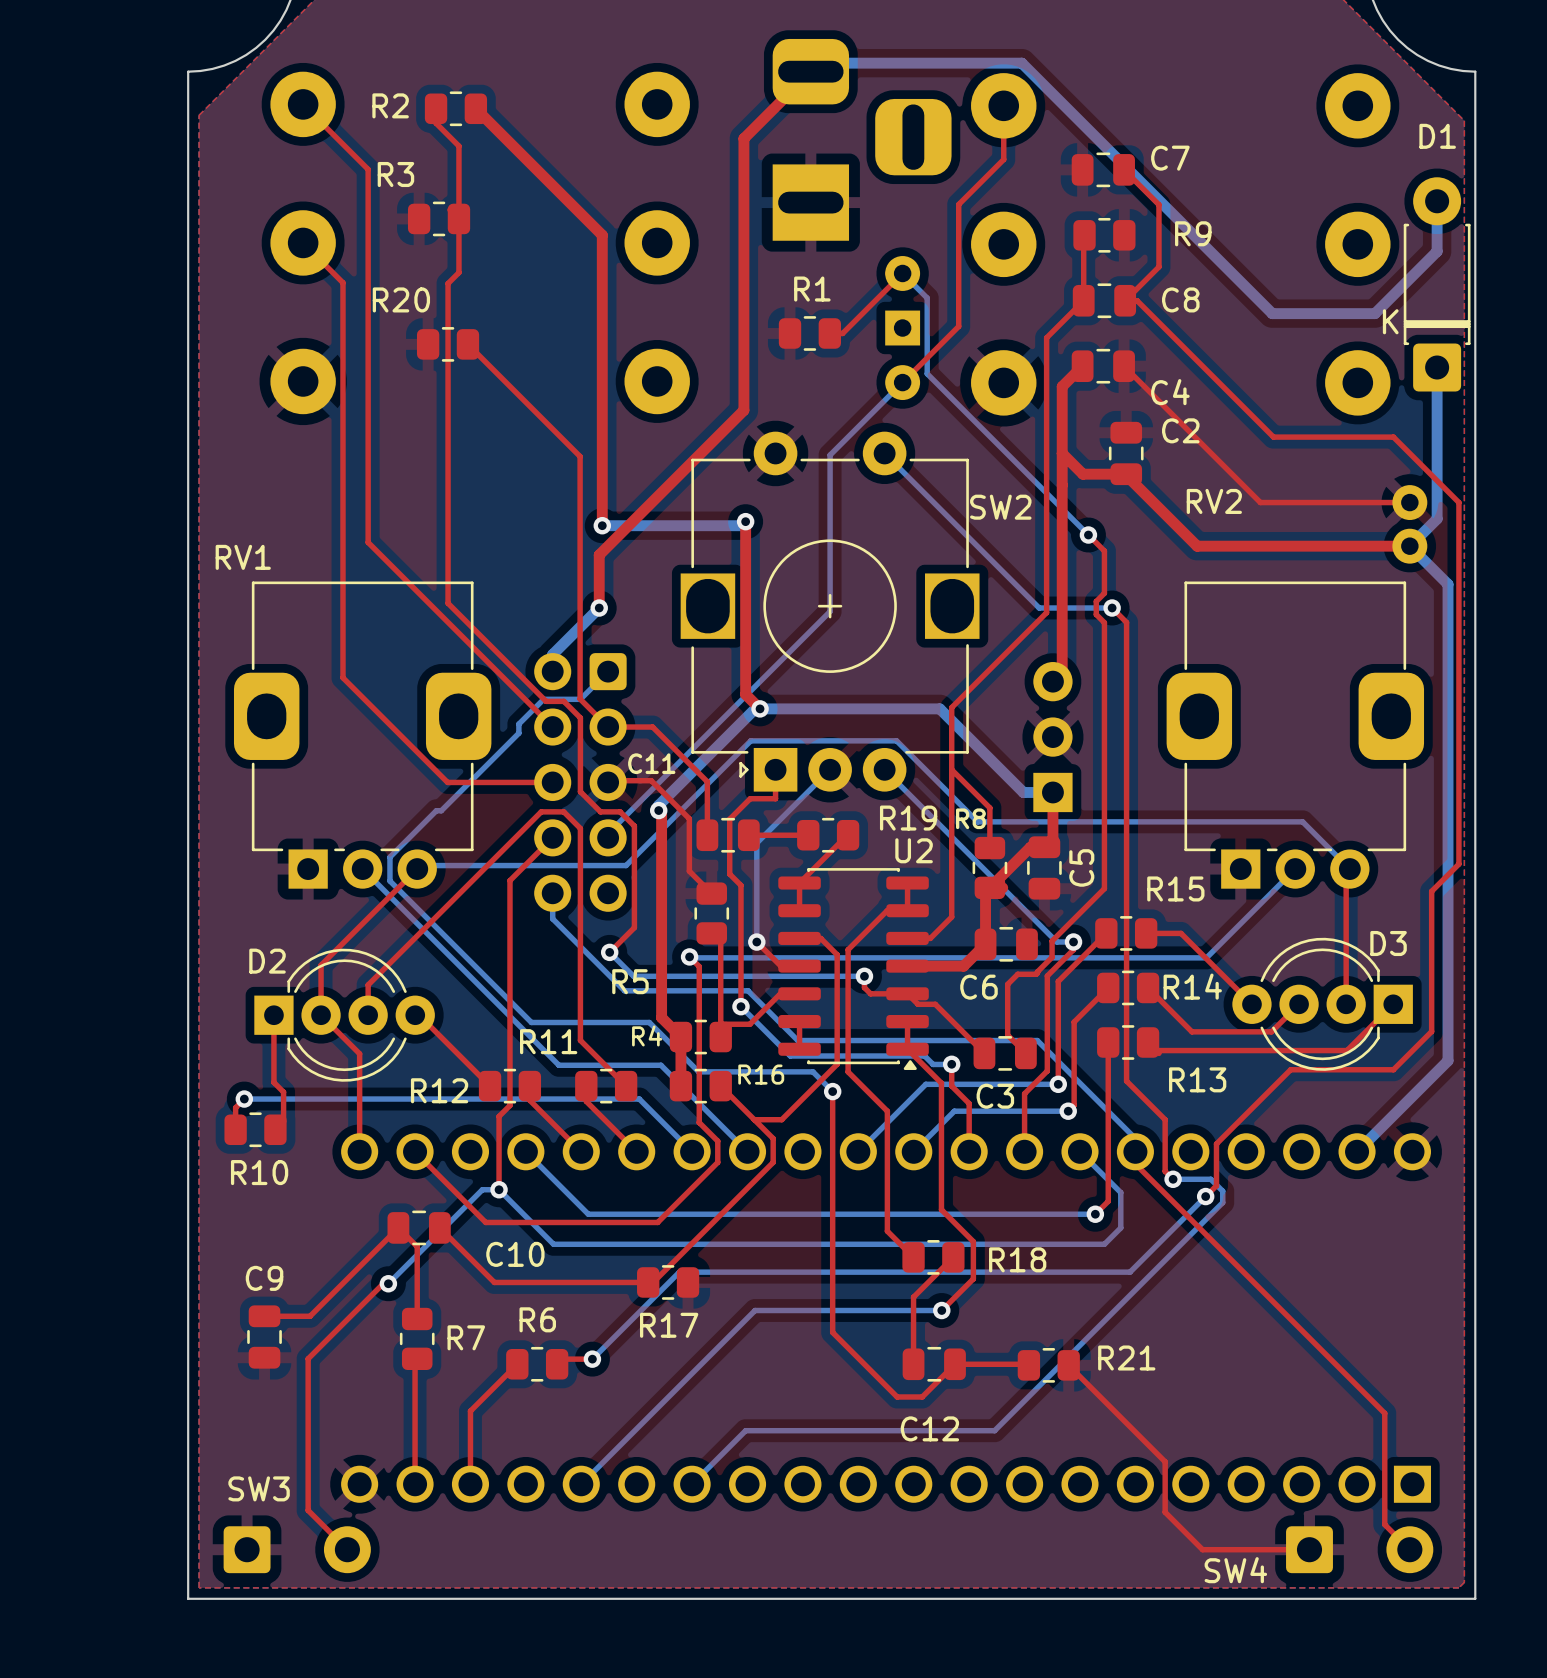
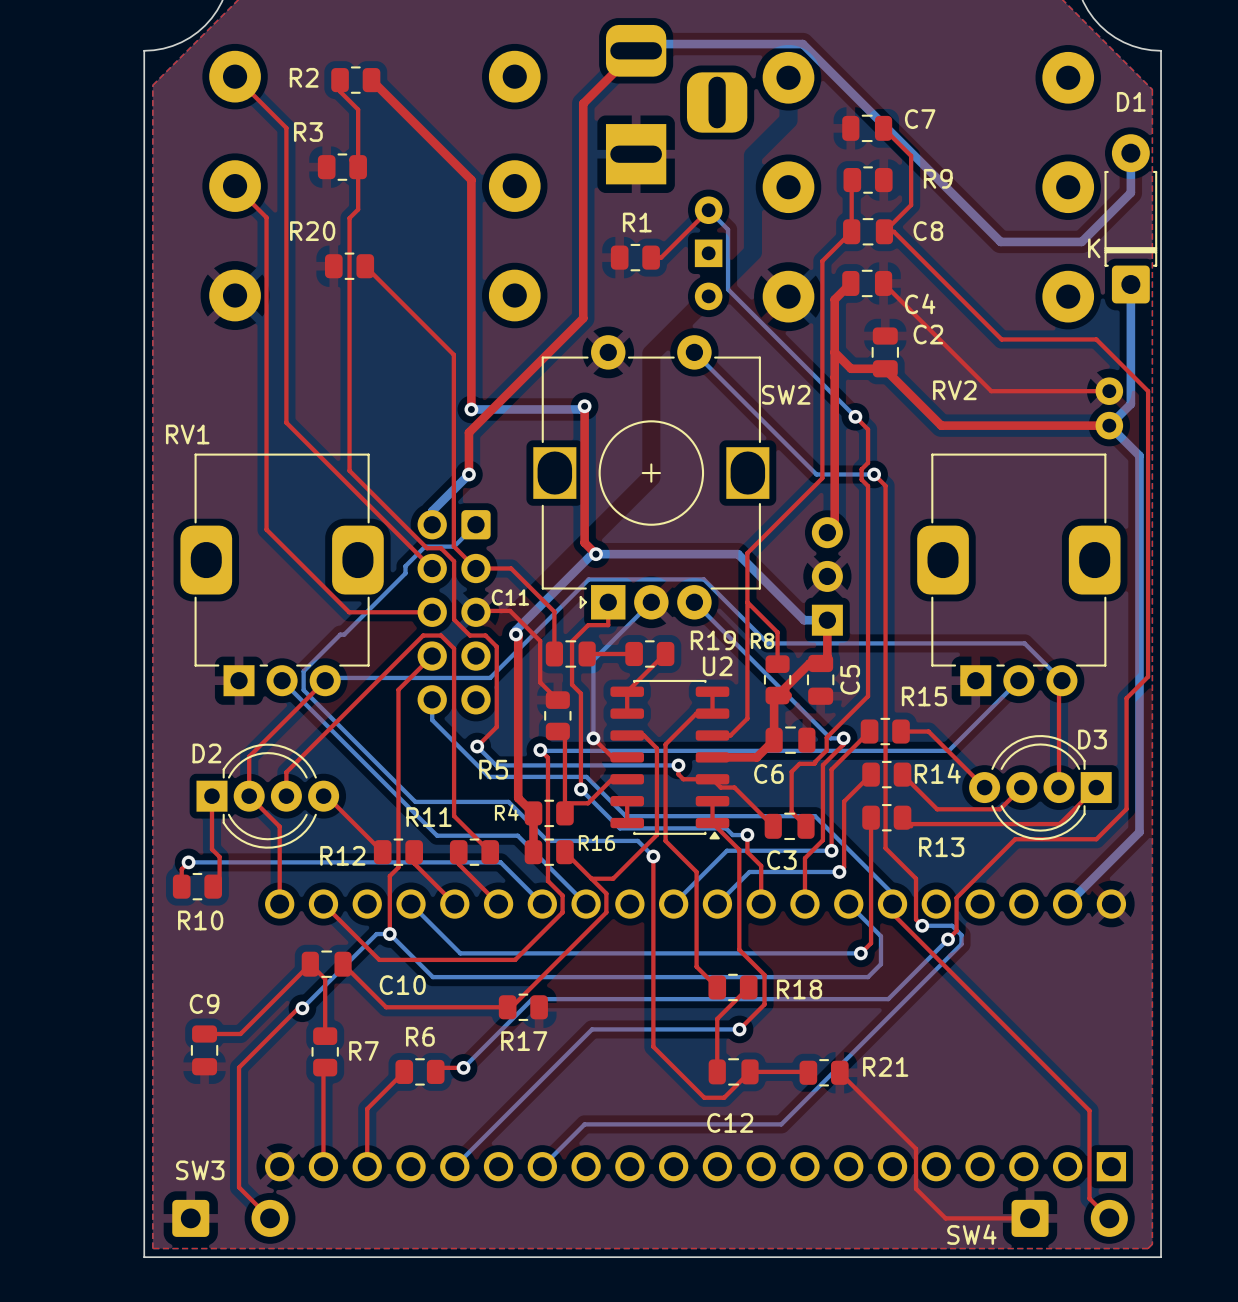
top track: (1003, 105) (1003, 159) (958, 204) (958, 326) (902, 382) -> none
bottom track: (902, 382) (830, 455) (830, 611) (608, 833) -> none

